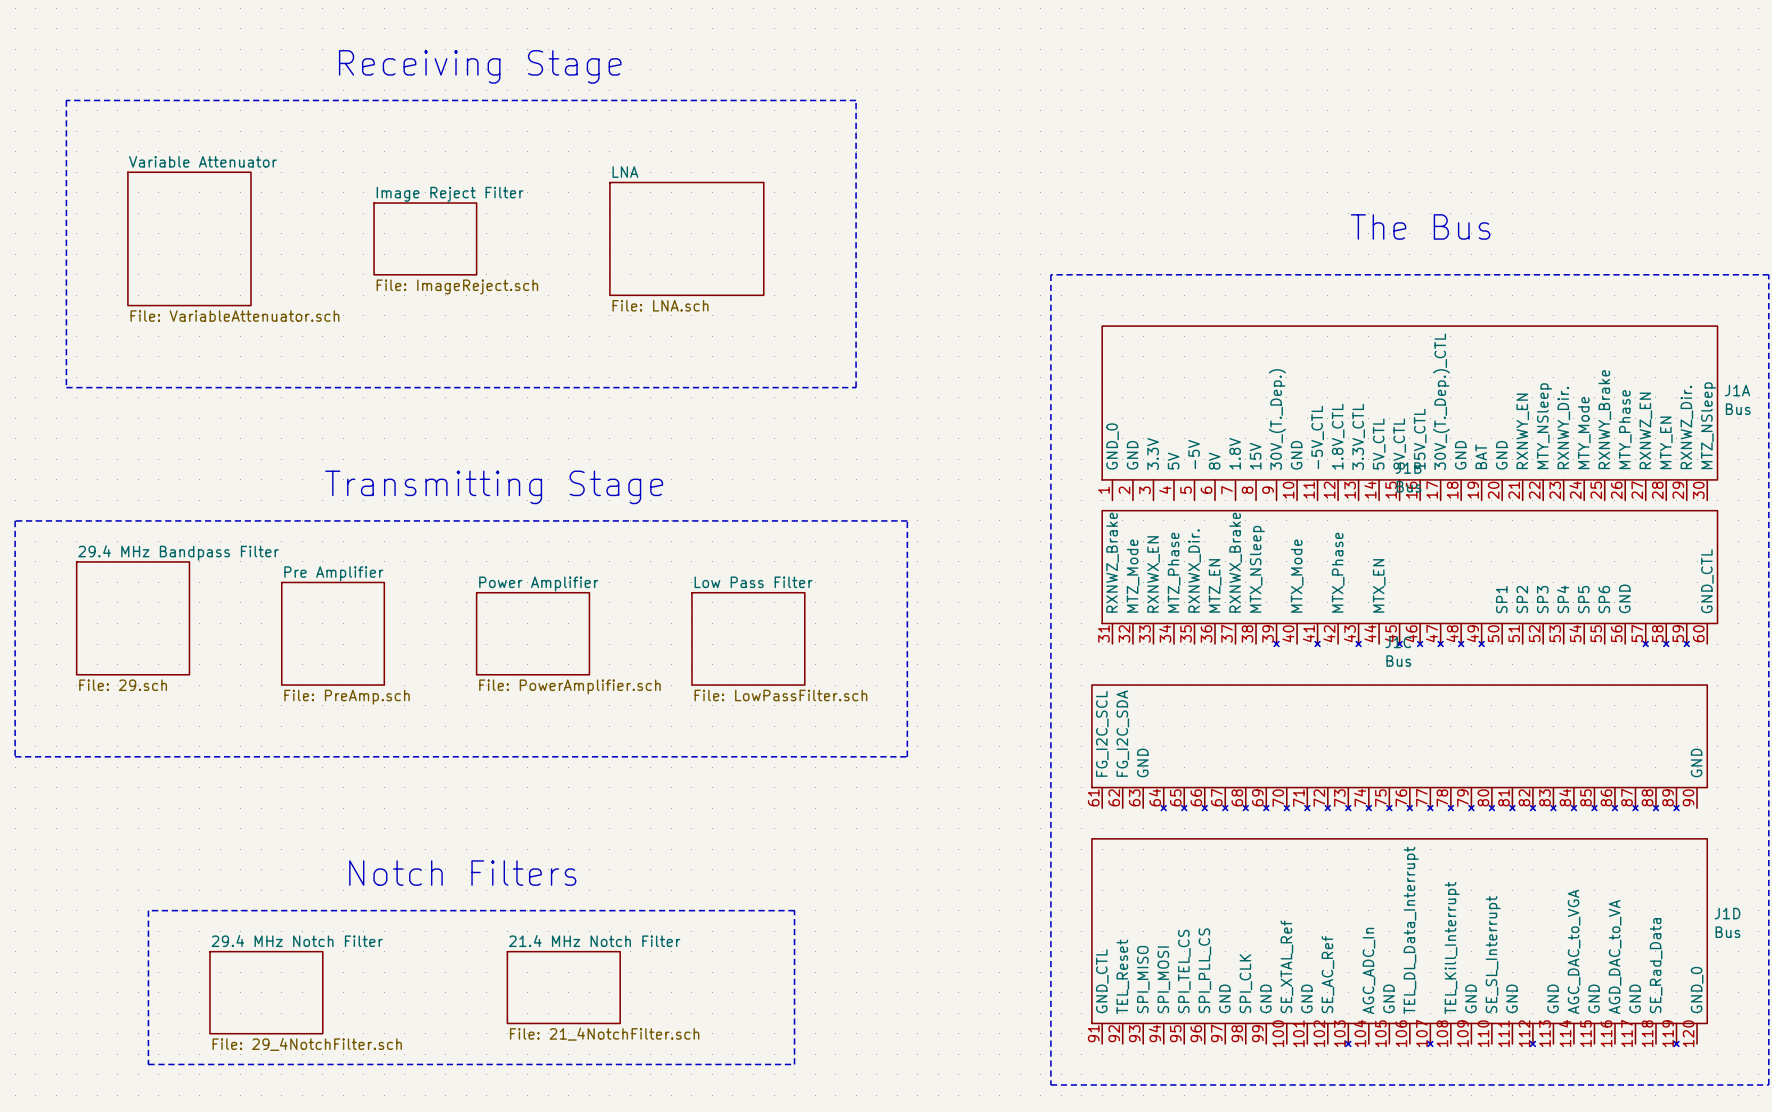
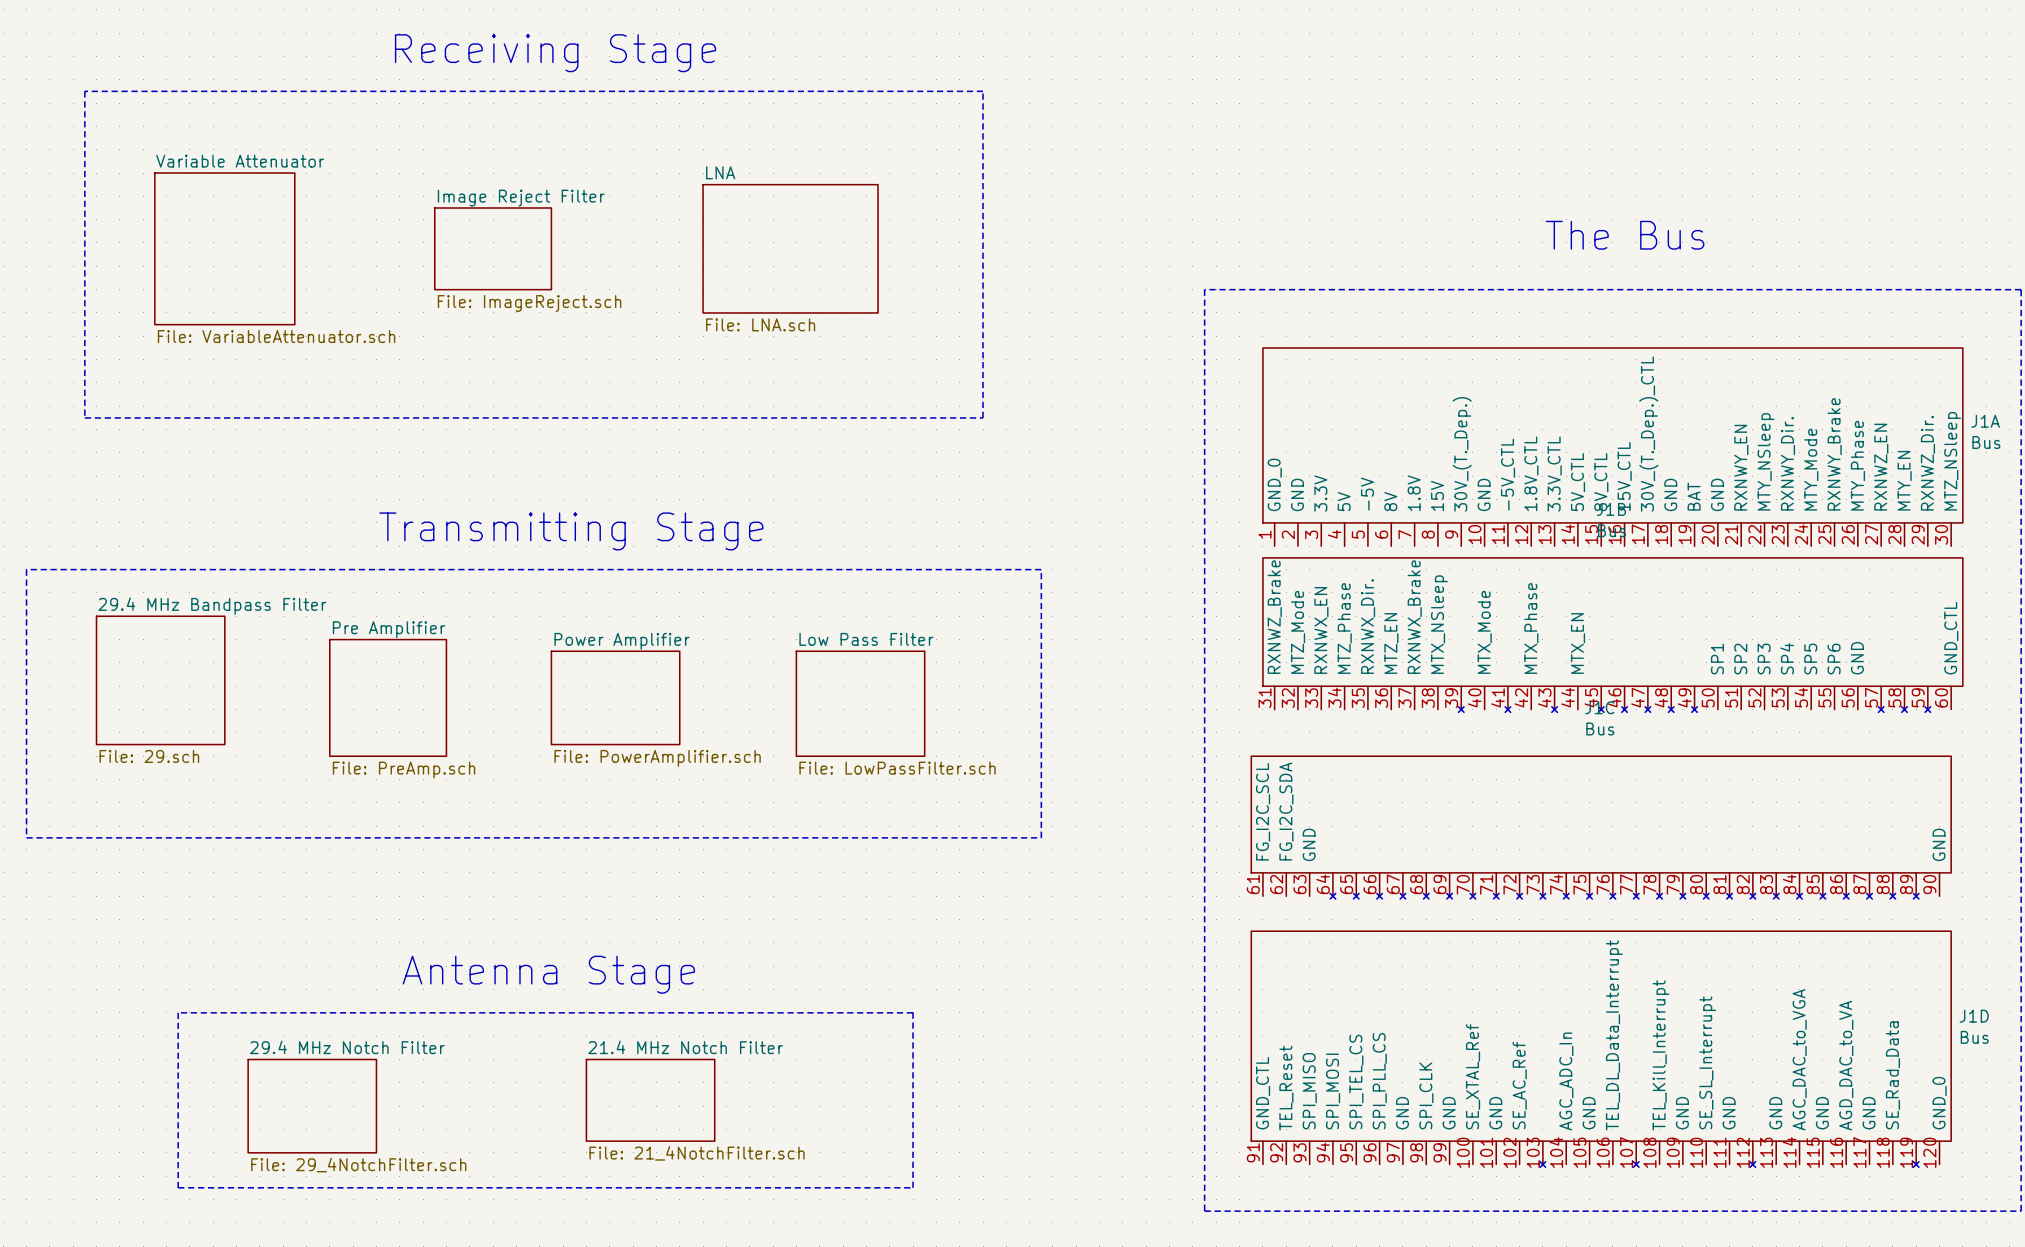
text: Notch Filters (462, 873) -> Antenna Stage (548, 974)

